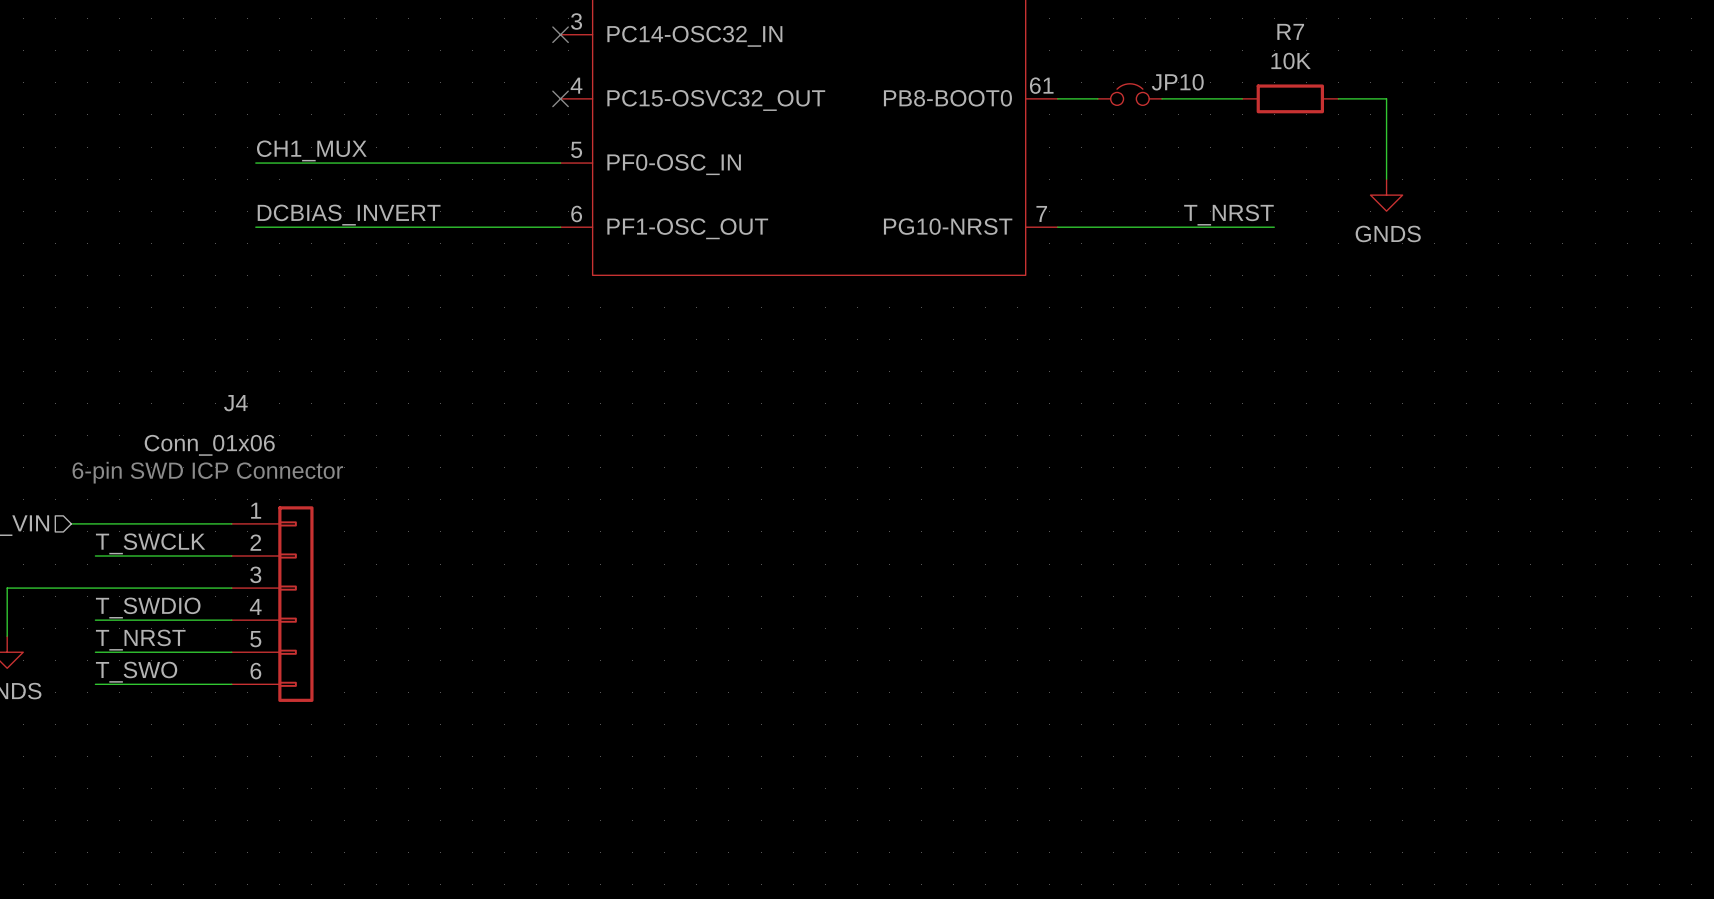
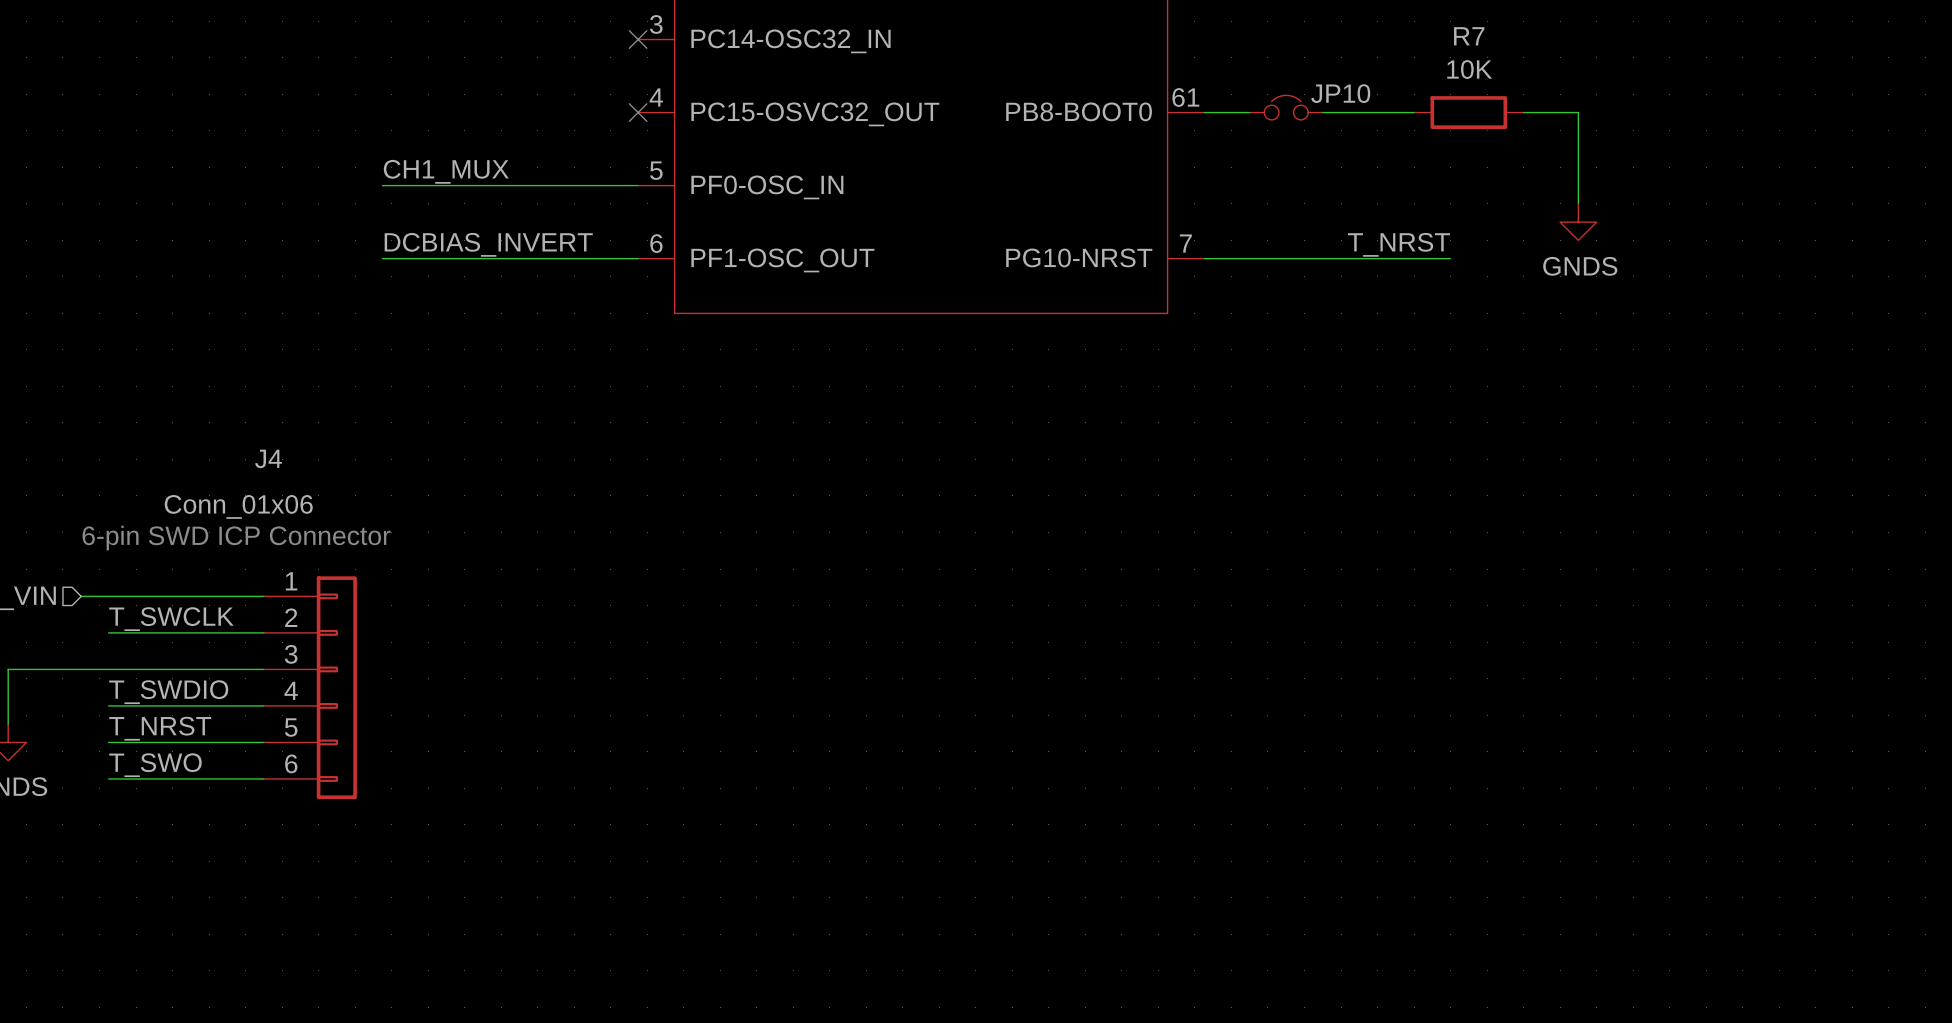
label position: CH1_MUX (311, 150) -> CH1_MUX (446, 171)
wire: (255, 163) (336, 163) -> none
label position: DCBIAS_INVERT (349, 215) -> DCBIAS_INVERT (488, 244)
wire: (255, 227) (336, 227) -> none

